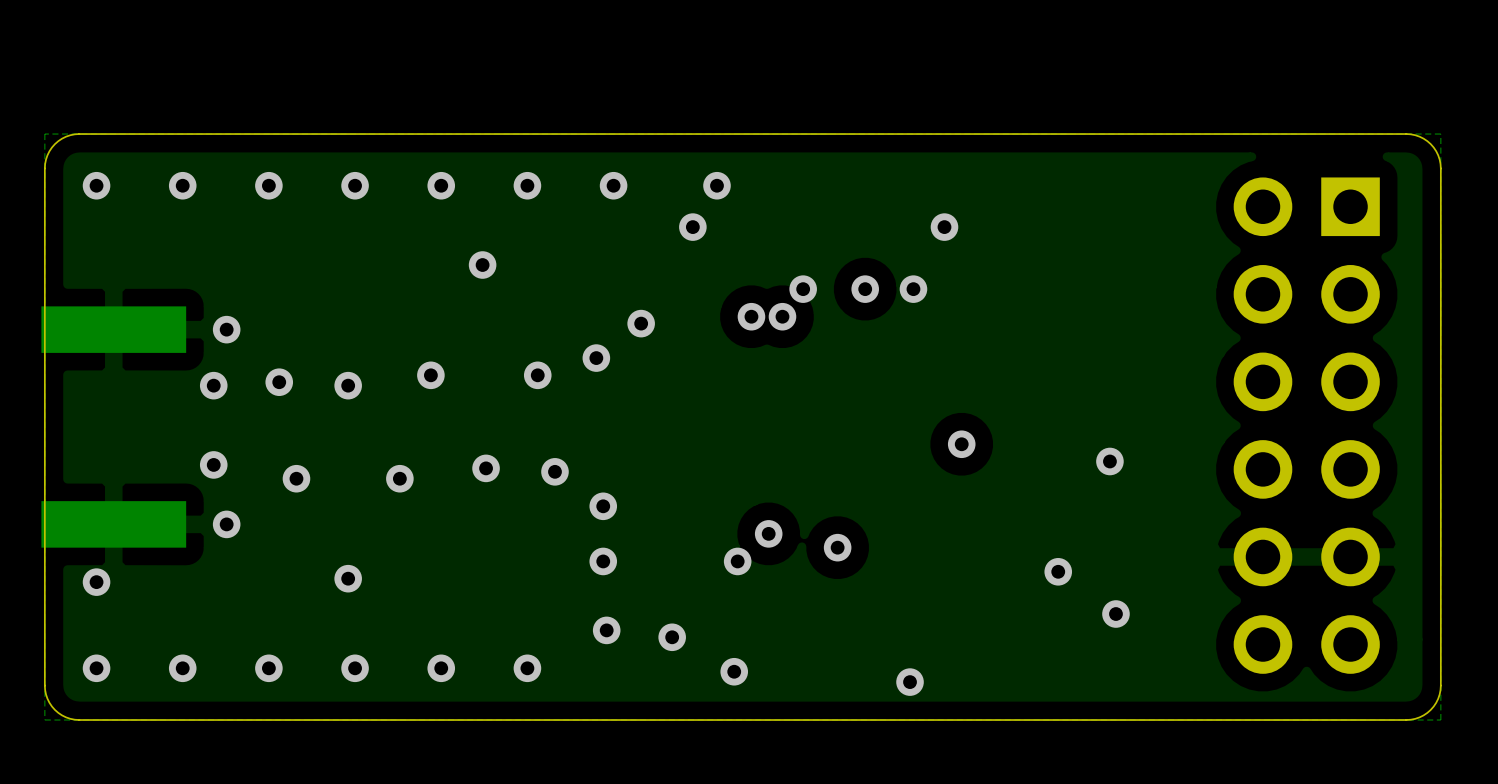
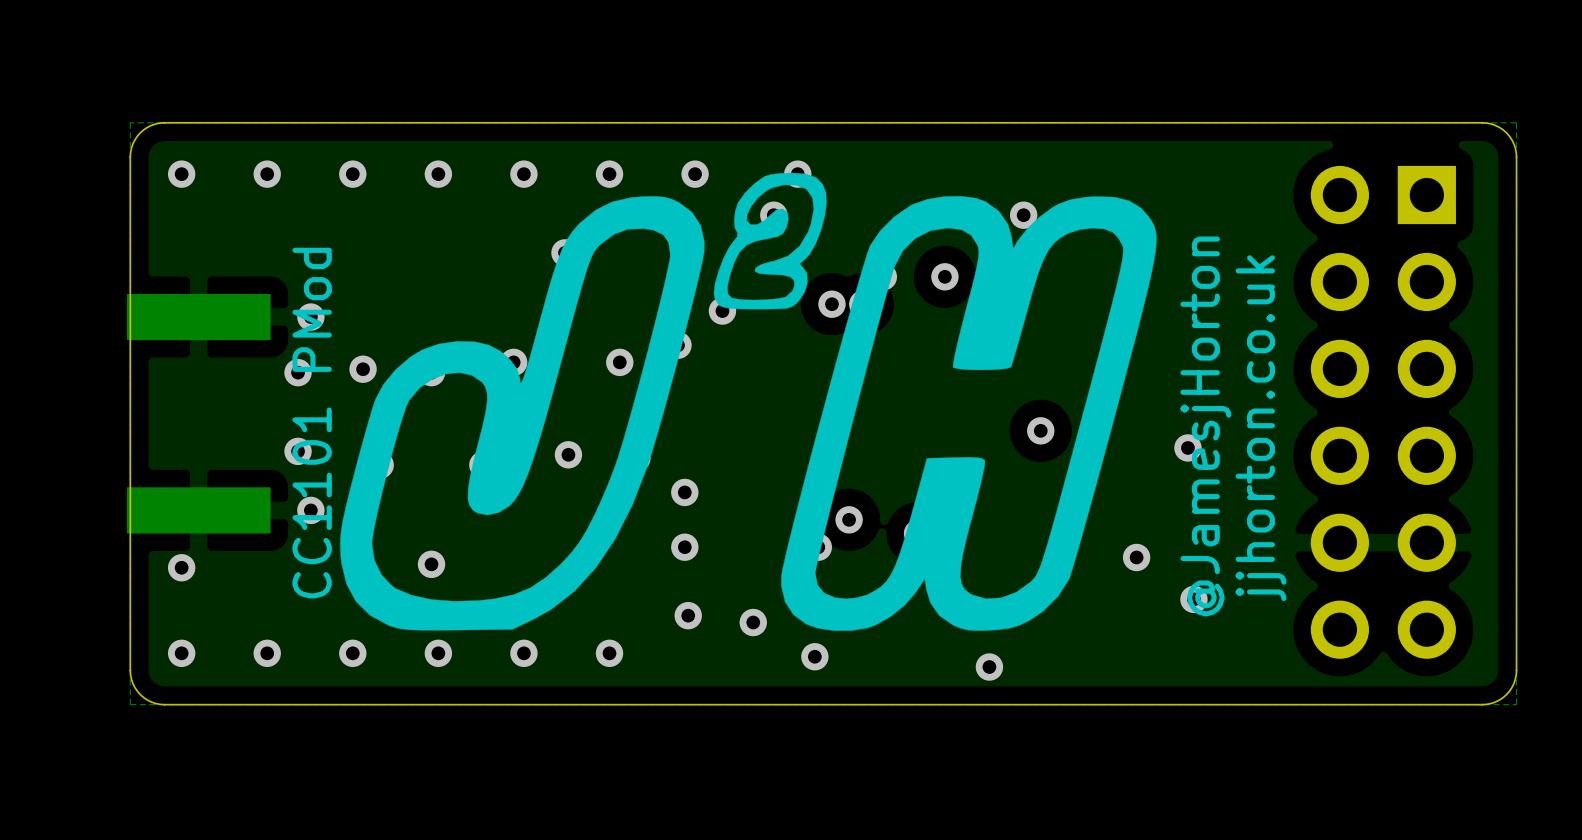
drawing: none -> [340, 172, 1157, 631]
text: none -> CC1101 PMod (312, 423)
text: none -> @JamesjHorton (1205, 426)
text: none -> jjhorton.co.uk (1261, 428)

